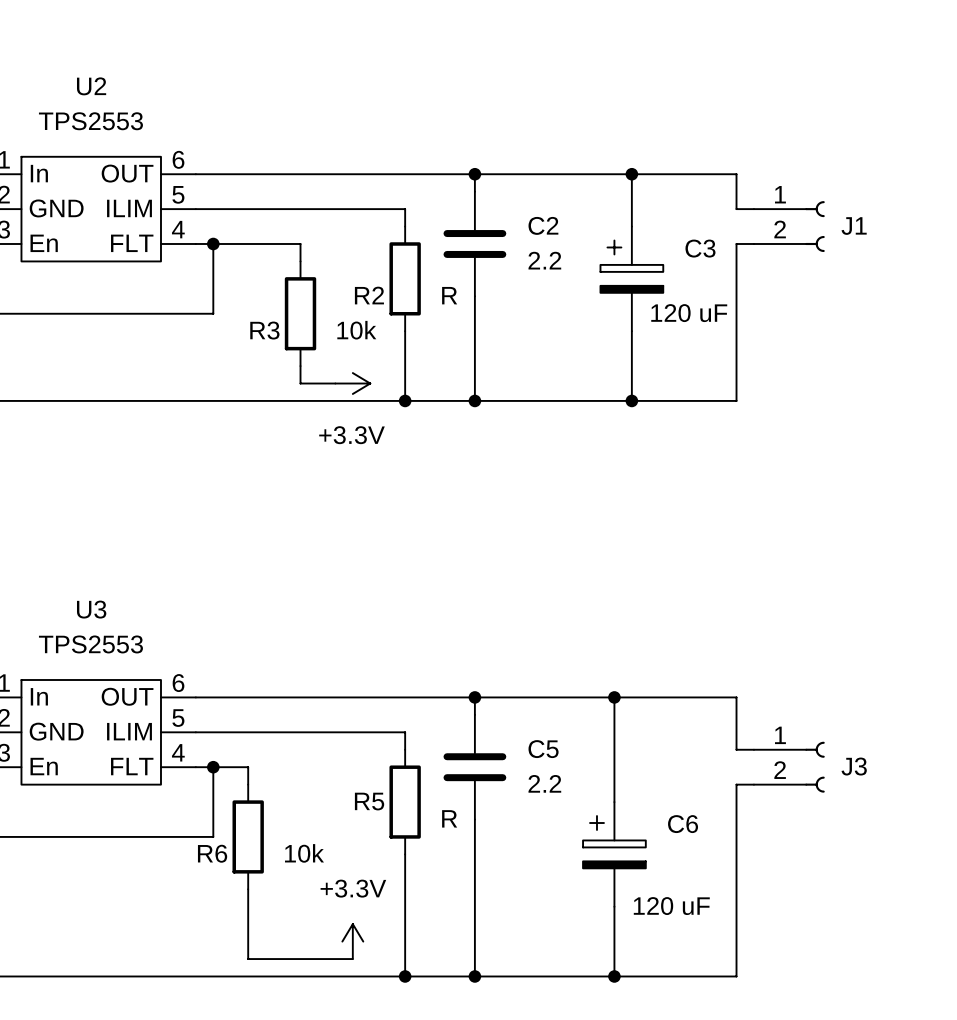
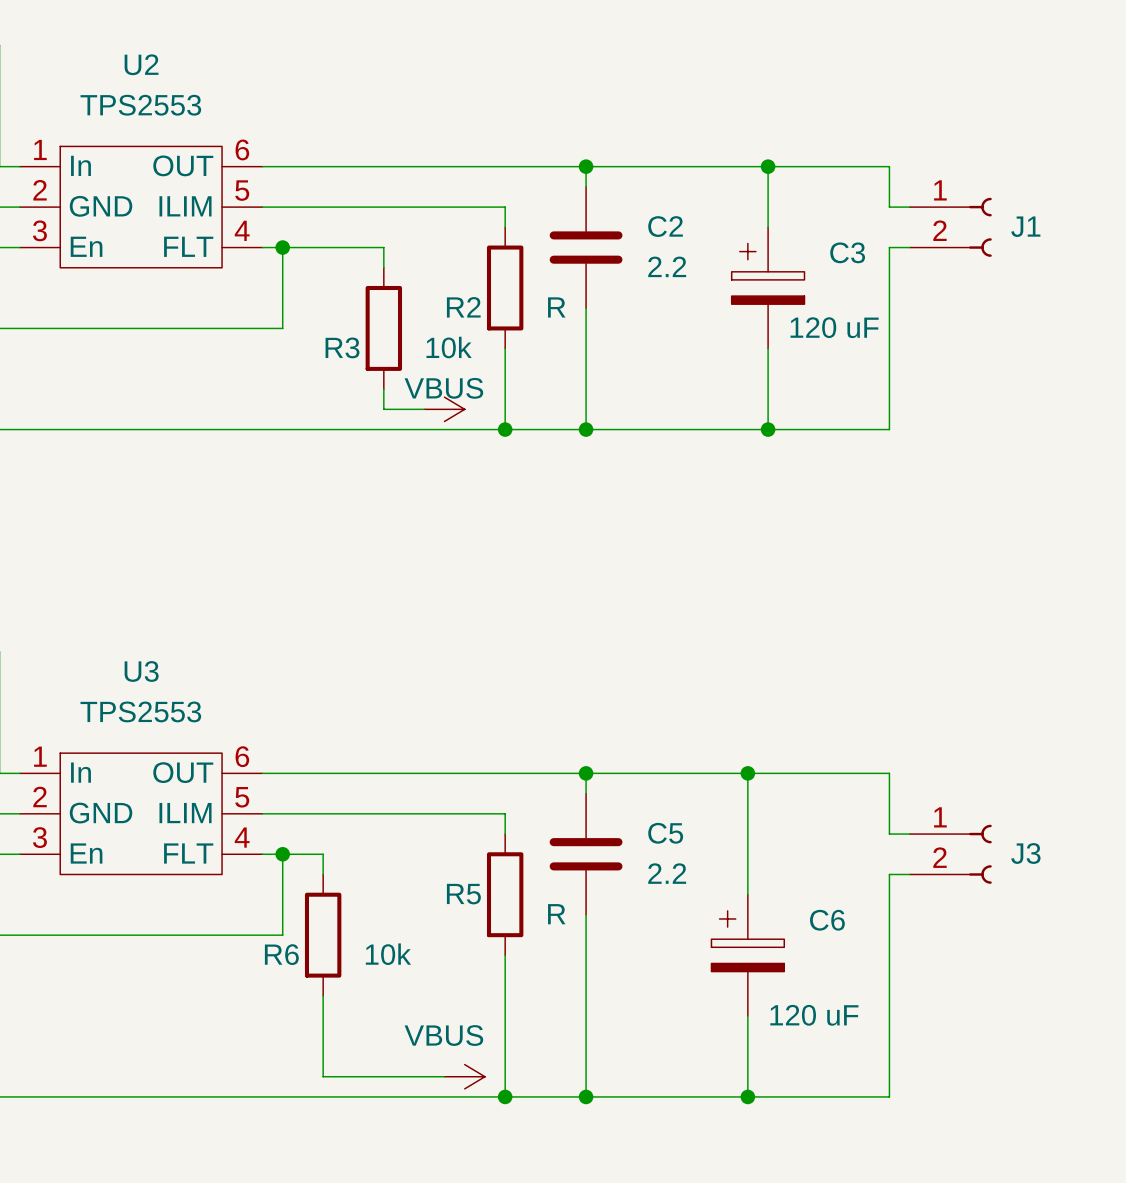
power symbol: +3.3V (352, 383) -> VBUS (444, 409)
power symbol: +3.3V (352, 941) -> none
power symbol: none -> VBUS (464, 1076)

